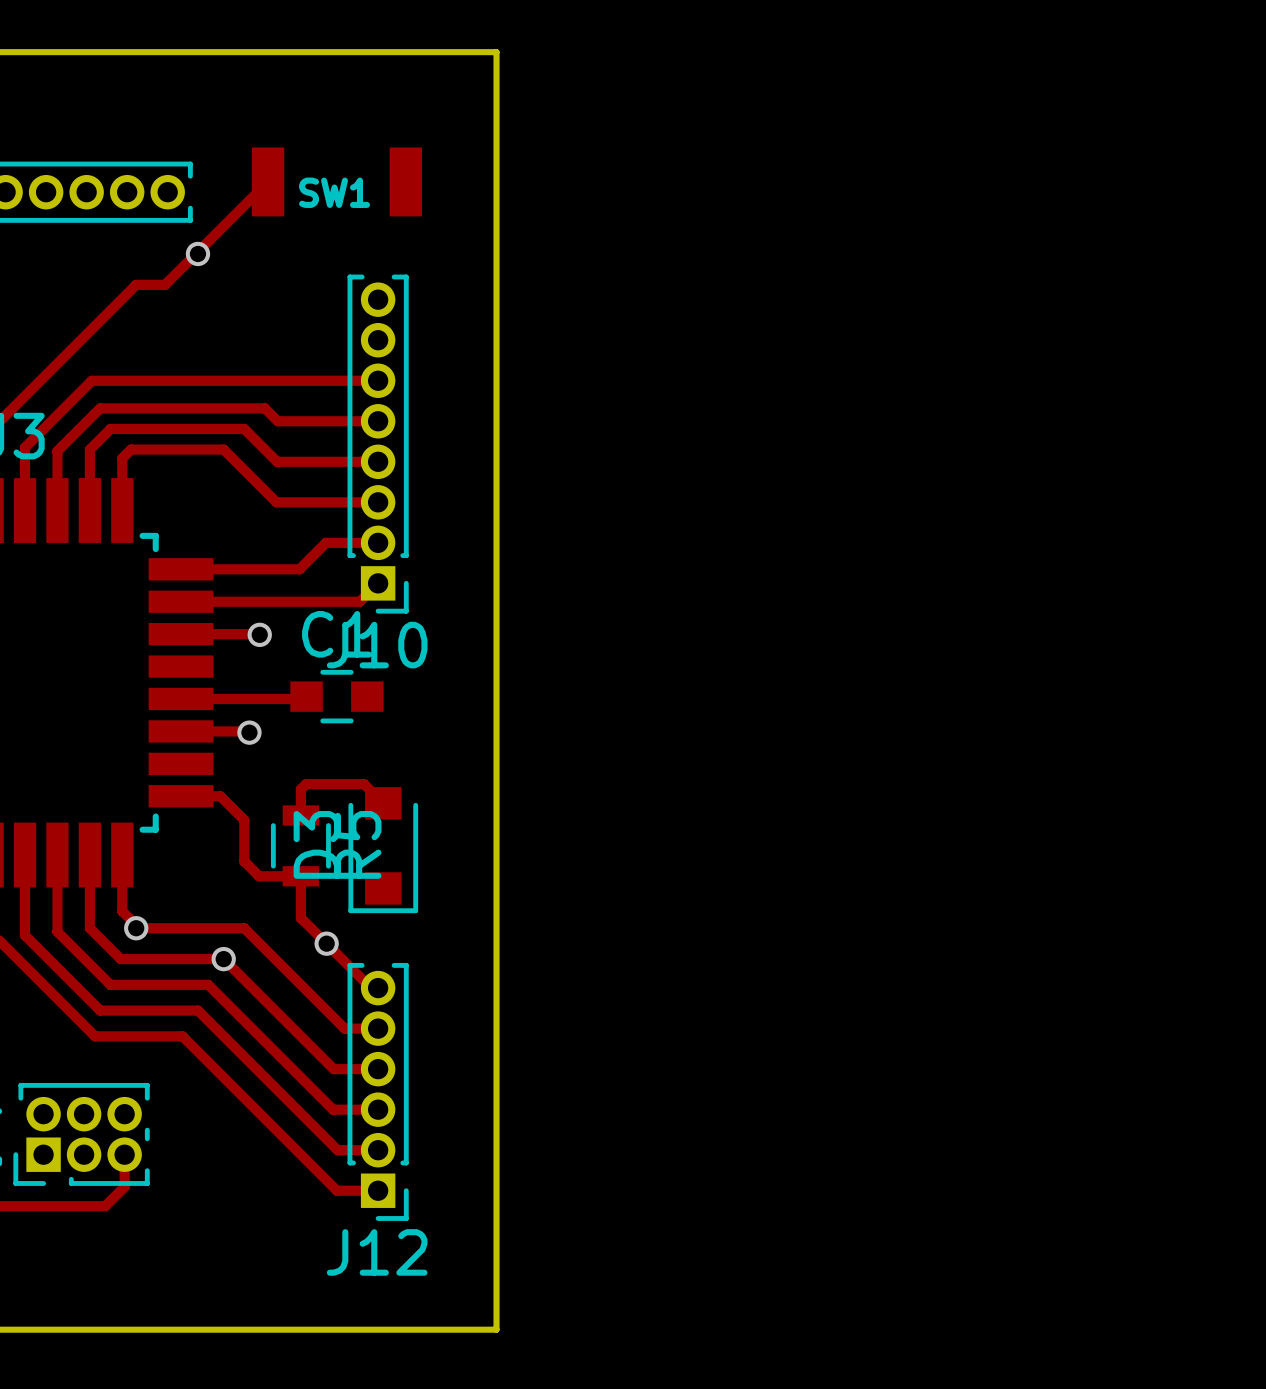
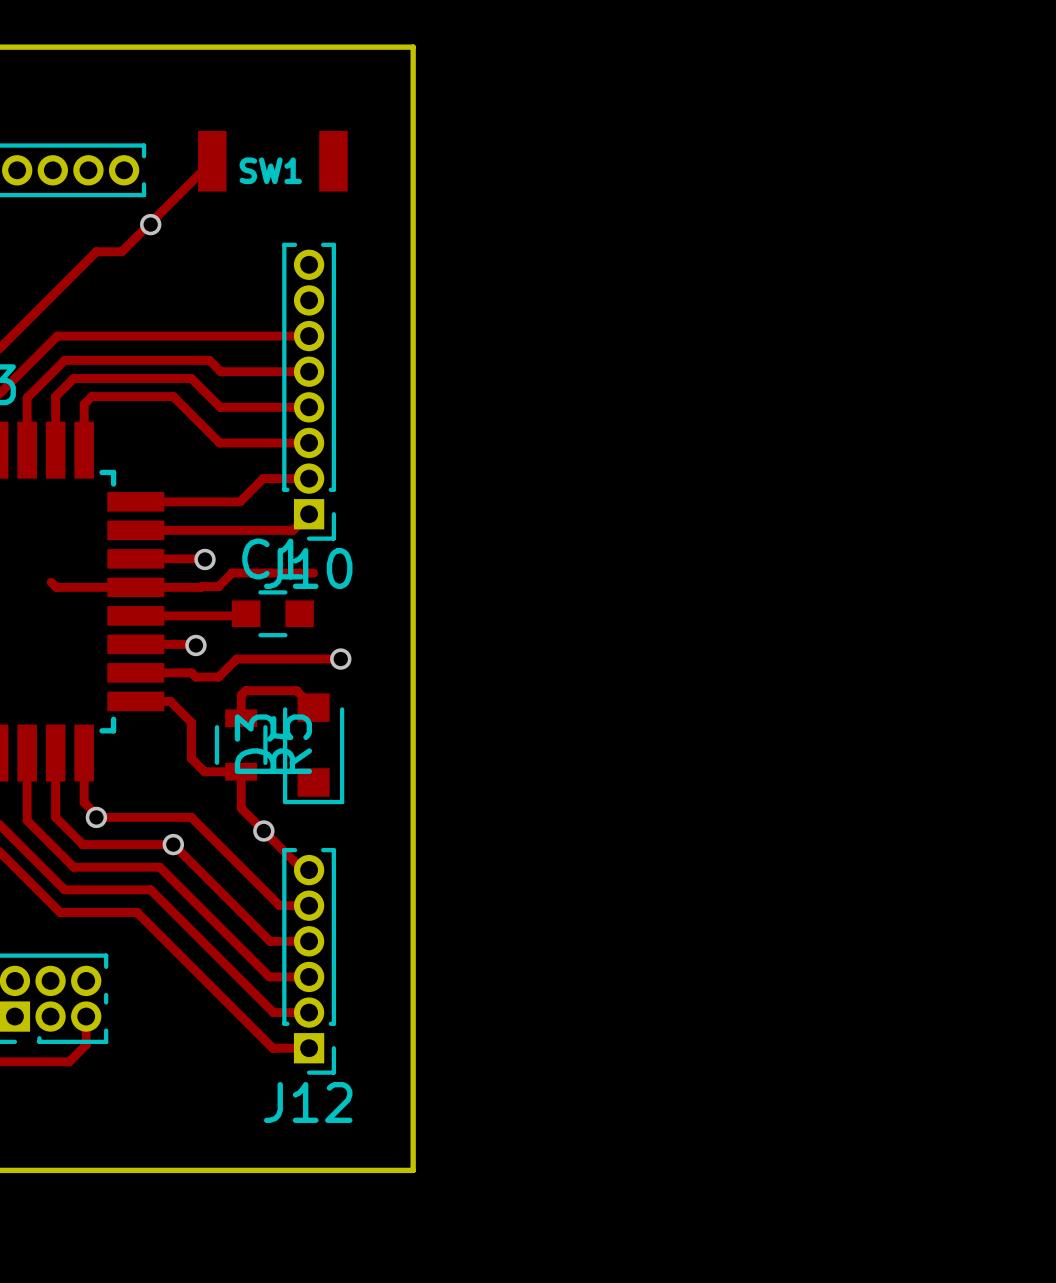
track: none -> (313, 573) (232, 573) (218, 586) (201, 587) (56, 587) (51, 582)
track: none -> (340, 659) (236, 659) (218, 677) (195, 677) (191, 672) (135, 672)
via: none -> (340, 659)

